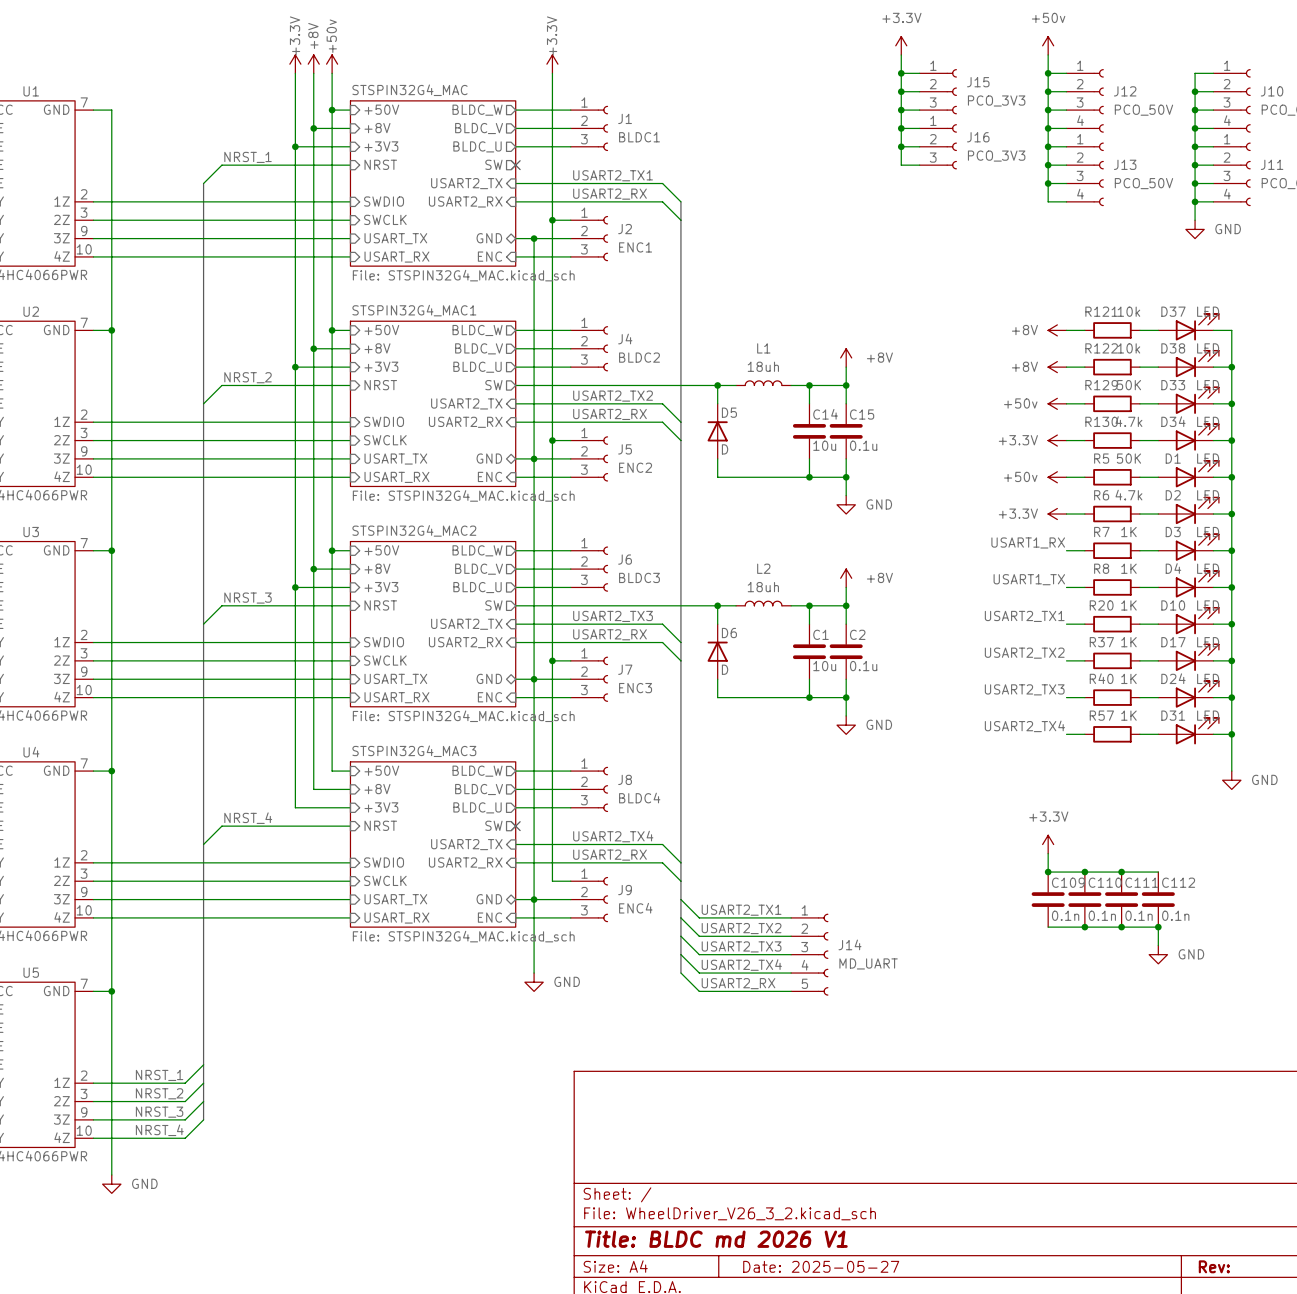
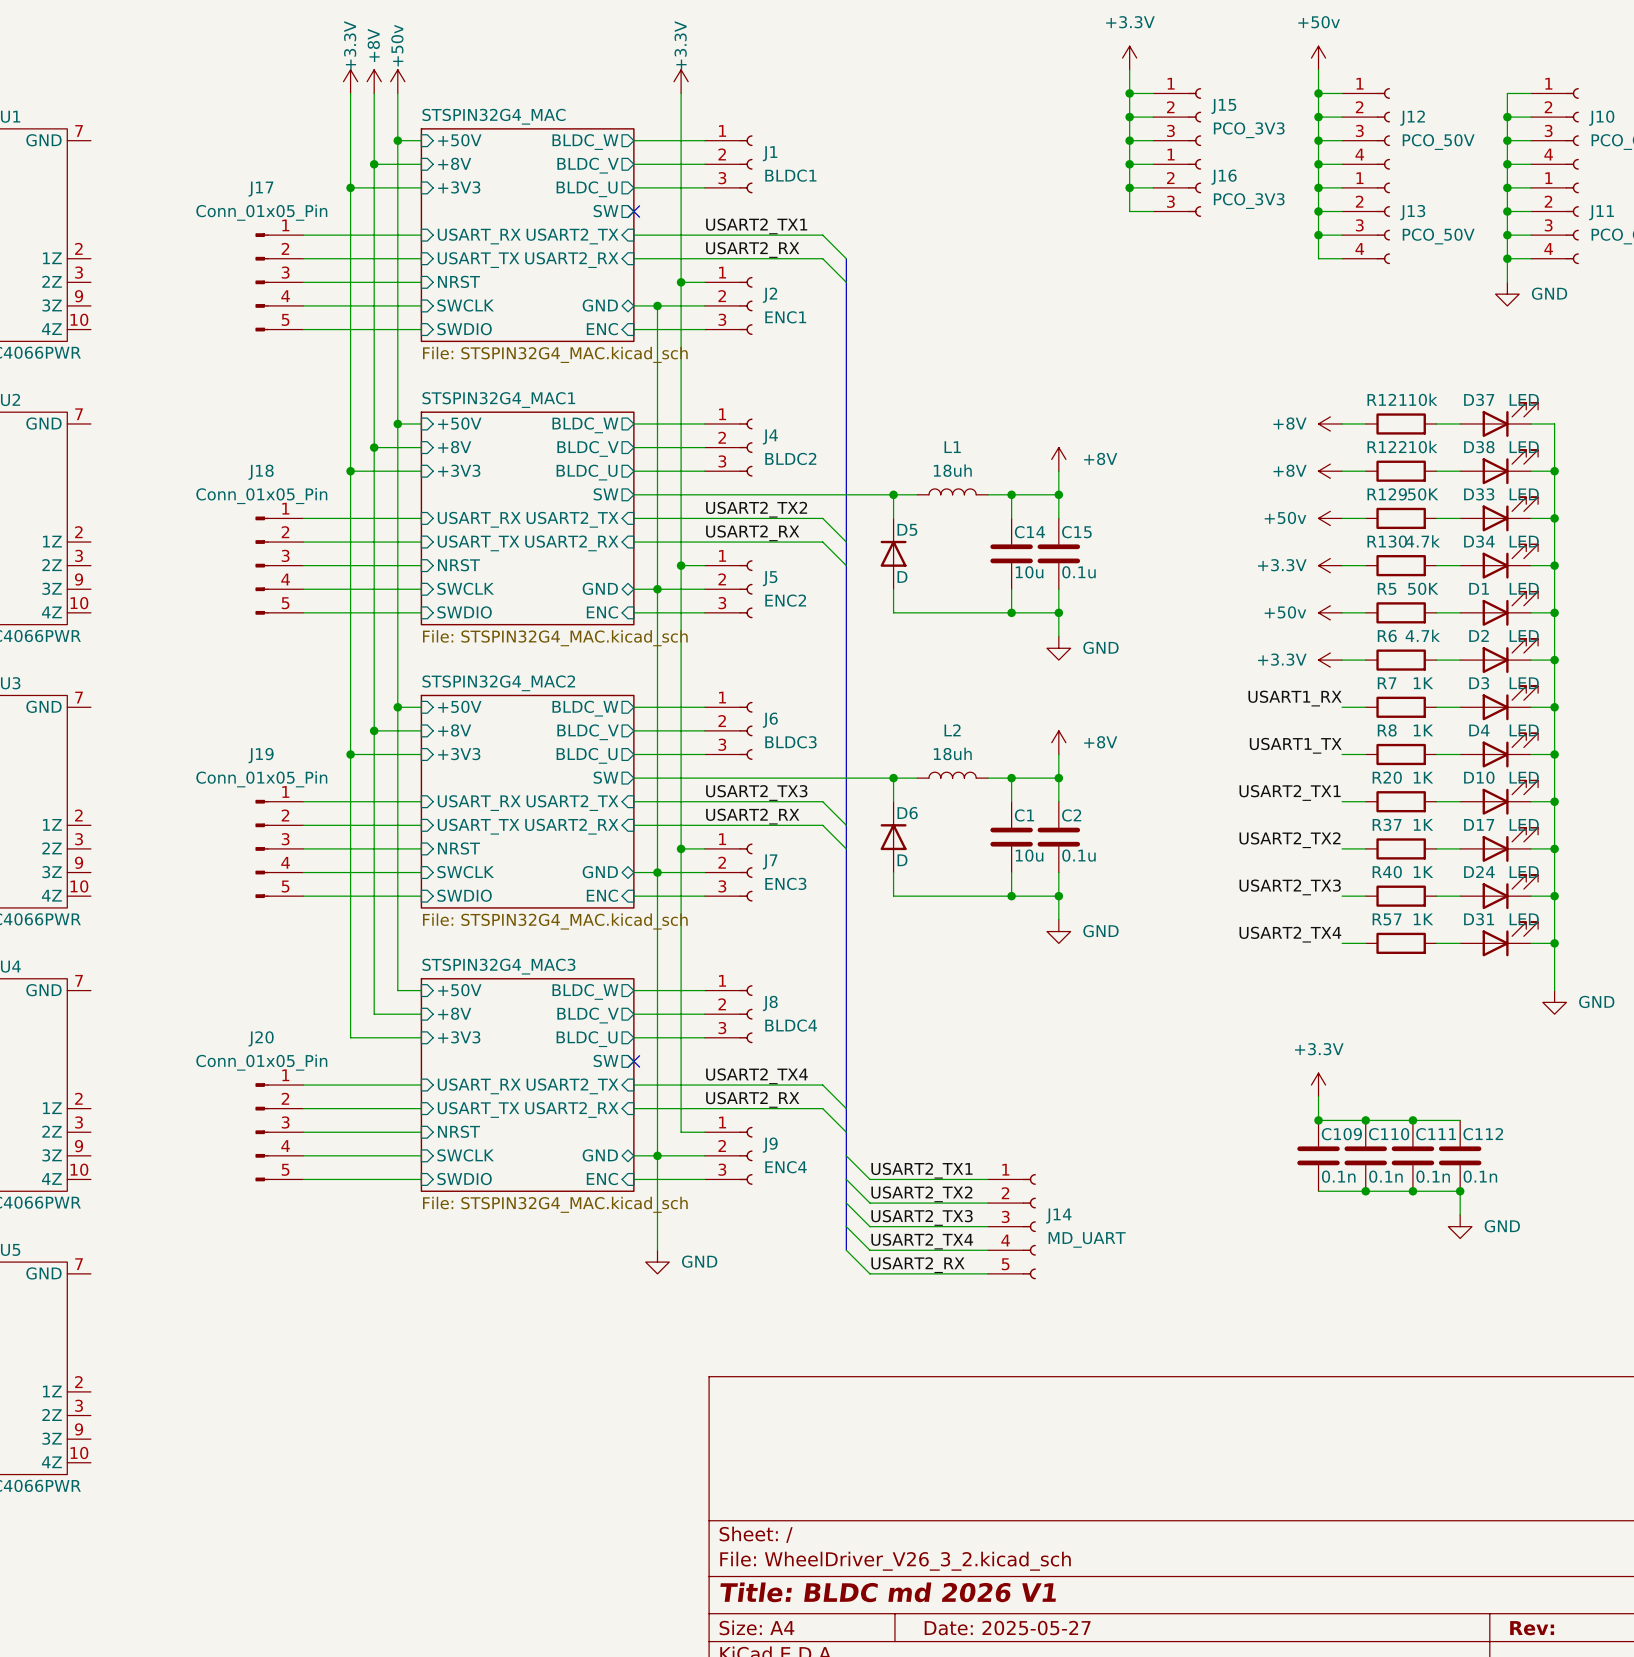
wire: (93, 110) (111, 110) (111, 1174) -> none
label: NRST_1 (248, 157) -> none
sheet pin: NRST (380, 164) -> none
wire: (350, 165) (221, 165) (203, 183) -> none
bus: (203, 183) (203, 1119) -> none
wire: none -> (303, 235) (421, 235)
sheet pin: none -> USART_RX (479, 236)
wire: (93, 201) (258, 201) -> none
sheet pin: SWDIO (384, 201) -> USART_TX (478, 260)
sheet pin: SWCLK (385, 219) -> NRST (458, 281)
wire: (93, 220) (258, 220) -> none
J17: none -> Conn_01x05_Pin (279, 282)
wire: (93, 238) (258, 238) -> none
sheet pin: USART_TX (395, 238) -> SWCLK (465, 305)
wire: (93, 256) (258, 256) -> none
sheet pin: USART_RX (396, 257) -> SWDIO (464, 329)
wire: (93, 330) (111, 330) -> none
junction: (111, 330) -> none
label: NRST_2 (248, 377) -> none
wire: (350, 385) (221, 385) (203, 403) -> none
sheet pin: NRST (380, 385) -> none
wire: none -> (303, 518) (421, 518)
sheet pin: none -> USART_RX (479, 519)
sheet pin: SWDIO (384, 421) -> USART_TX (478, 543)
wire: (93, 422) (258, 422) -> none
wire: (93, 440) (258, 440) -> none
J18: none -> Conn_01x05_Pin (279, 565)
sheet pin: SWCLK (385, 440) -> NRST (458, 565)
wire: (93, 458) (258, 458) -> none
sheet pin: USART_TX (395, 459) -> SWCLK (465, 588)
wire: (93, 477) (258, 477) -> none
sheet pin: USART_RX (396, 477) -> SWDIO (464, 612)
wire: (93, 550) (111, 550) -> none
junction: (111, 550) -> none
label: NRST_3 (248, 598) -> none
wire: (350, 605) (221, 605) (203, 624) -> none
sheet pin: NRST (380, 605) -> none
wire: none -> (303, 801) (421, 801)
sheet pin: none -> USART_RX (479, 803)
wire: (93, 642) (258, 642) -> none
sheet pin: SWDIO (384, 642) -> USART_TX (478, 826)
wire: (93, 660) (258, 660) -> none
J19: none -> Conn_01x05_Pin (279, 848)
sheet pin: SWCLK (385, 660) -> NRST (458, 848)
wire: (93, 679) (258, 679) -> none
sheet pin: USART_TX (395, 679) -> SWCLK (465, 872)
wire: (93, 697) (258, 697) -> none
sheet pin: USART_RX (396, 697) -> SWDIO (464, 895)
wire: (93, 771) (111, 771) -> none
junction: (111, 771) -> none
label: NRST_4 (248, 818) -> none
sheet pin: NRST (380, 825) -> none
wire: (350, 826) (221, 826) (203, 844) -> none
wire: none -> (303, 1085) (421, 1085)
sheet pin: none -> USART_RX (479, 1086)
wire: (93, 862) (258, 862) -> none
sheet pin: SWDIO (384, 862) -> USART_TX (478, 1109)
sheet pin: SWCLK (385, 880) -> NRST (458, 1131)
wire: (93, 881) (258, 881) -> none
J20: none -> Conn_01x05_Pin (279, 1132)
wire: (93, 899) (258, 899) -> none
sheet pin: USART_TX (395, 899) -> SWCLK (465, 1155)
wire: (93, 917) (258, 917) -> none
sheet pin: USART_RX (396, 918) -> SWDIO (464, 1179)
wire: (93, 991) (111, 991) -> none
junction: (111, 991) -> none
wire: (203, 1064) (185, 1083) (93, 1083) -> none
label: NRST_1 (159, 1075) -> none
wire: (203, 1083) (185, 1101) (93, 1101) -> none
label: NRST_2 (159, 1093) -> none
wire: (203, 1101) (185, 1119) (93, 1119) -> none
label: NRST_3 (159, 1112) -> none
wire: (203, 1119) (185, 1138) (93, 1138) -> none
label: NRST_4 (159, 1130) -> none
power symbol: GND (111, 1184) -> none

